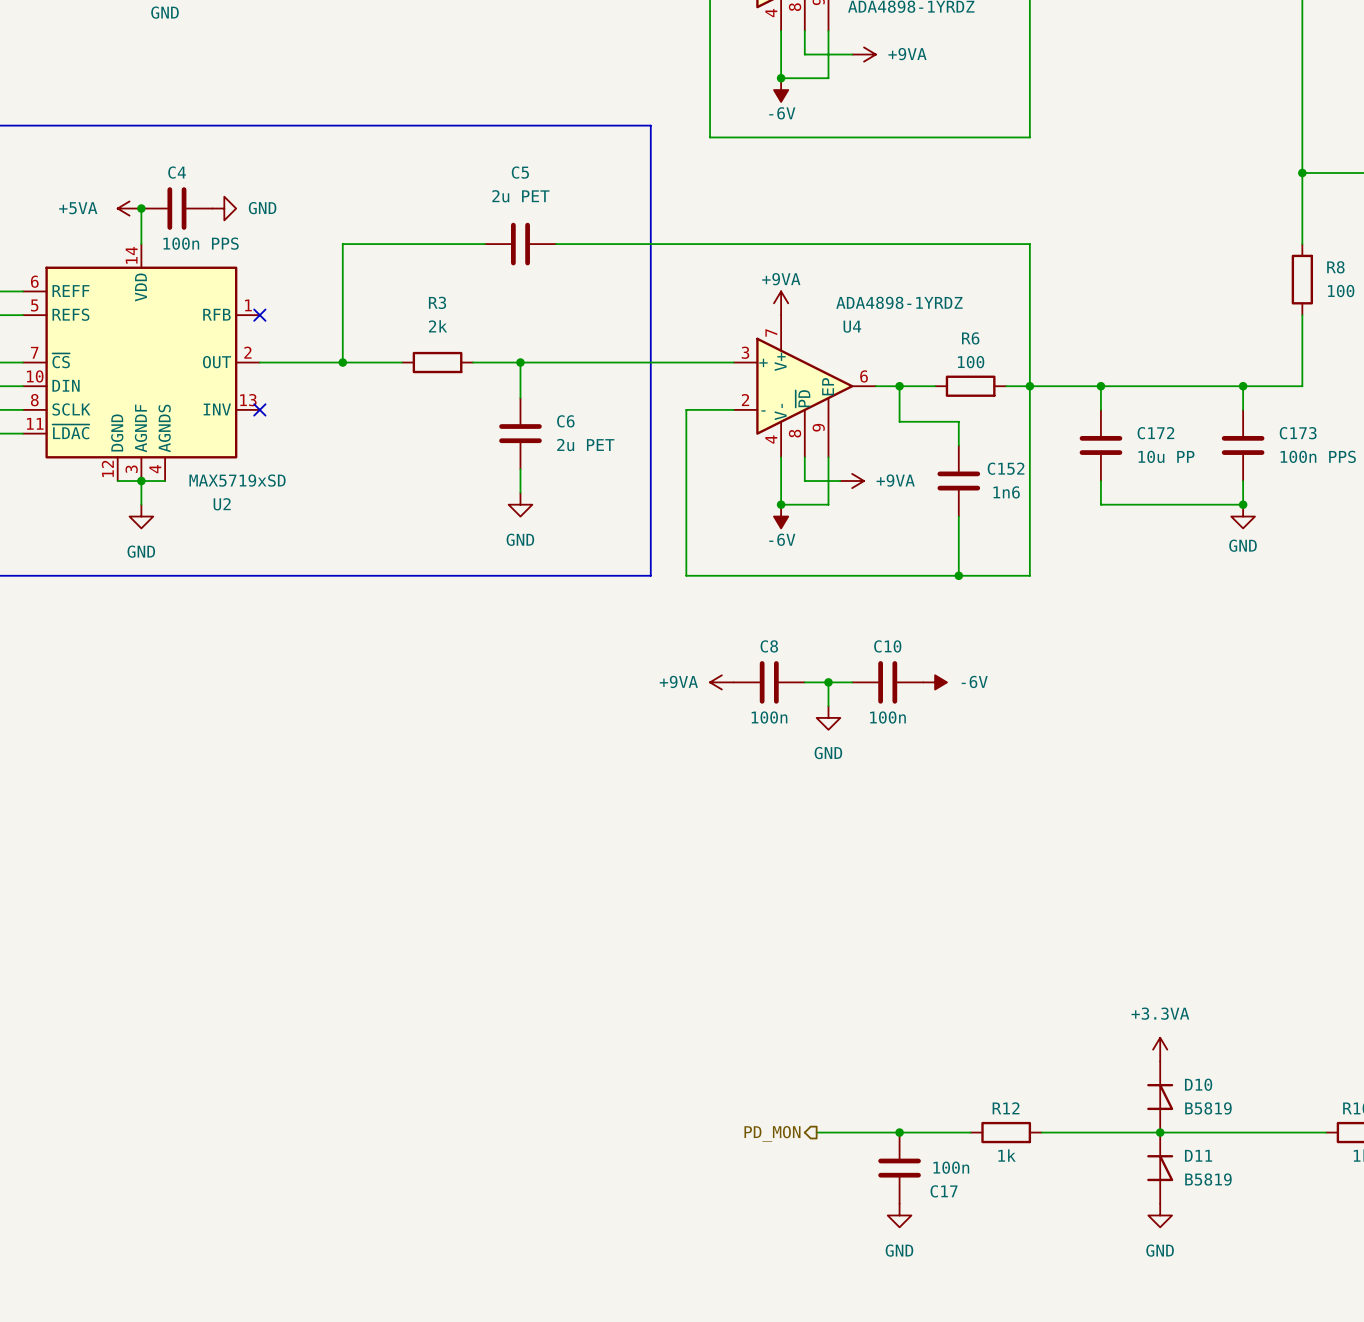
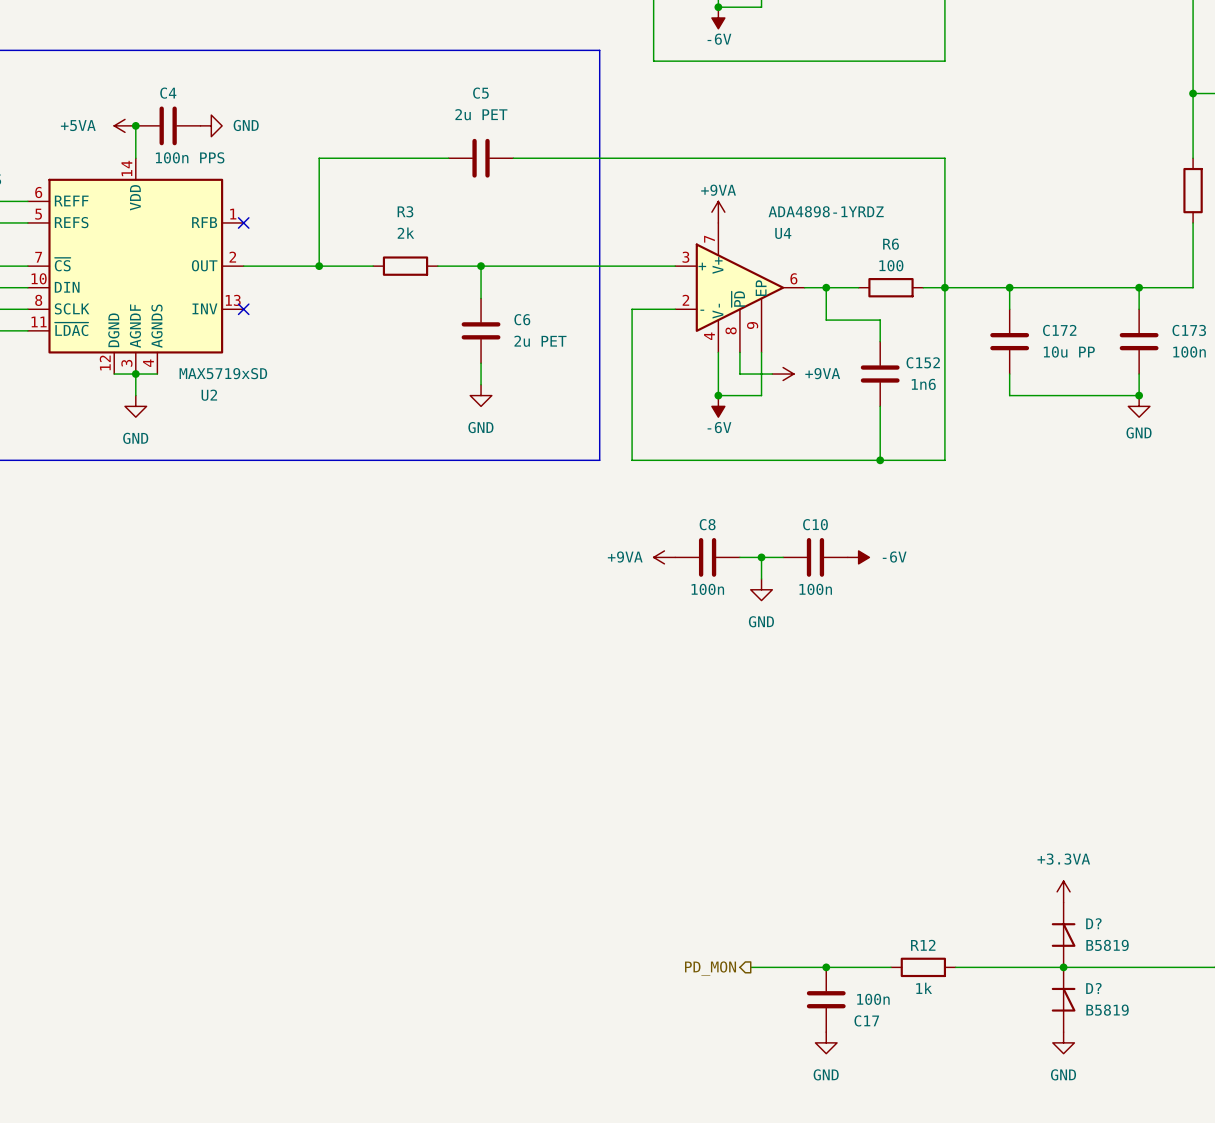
D10 name: D10 (1198, 1084) -> D? (1093, 923)
D11 name: D11 (1198, 1155) -> D? (1093, 988)

